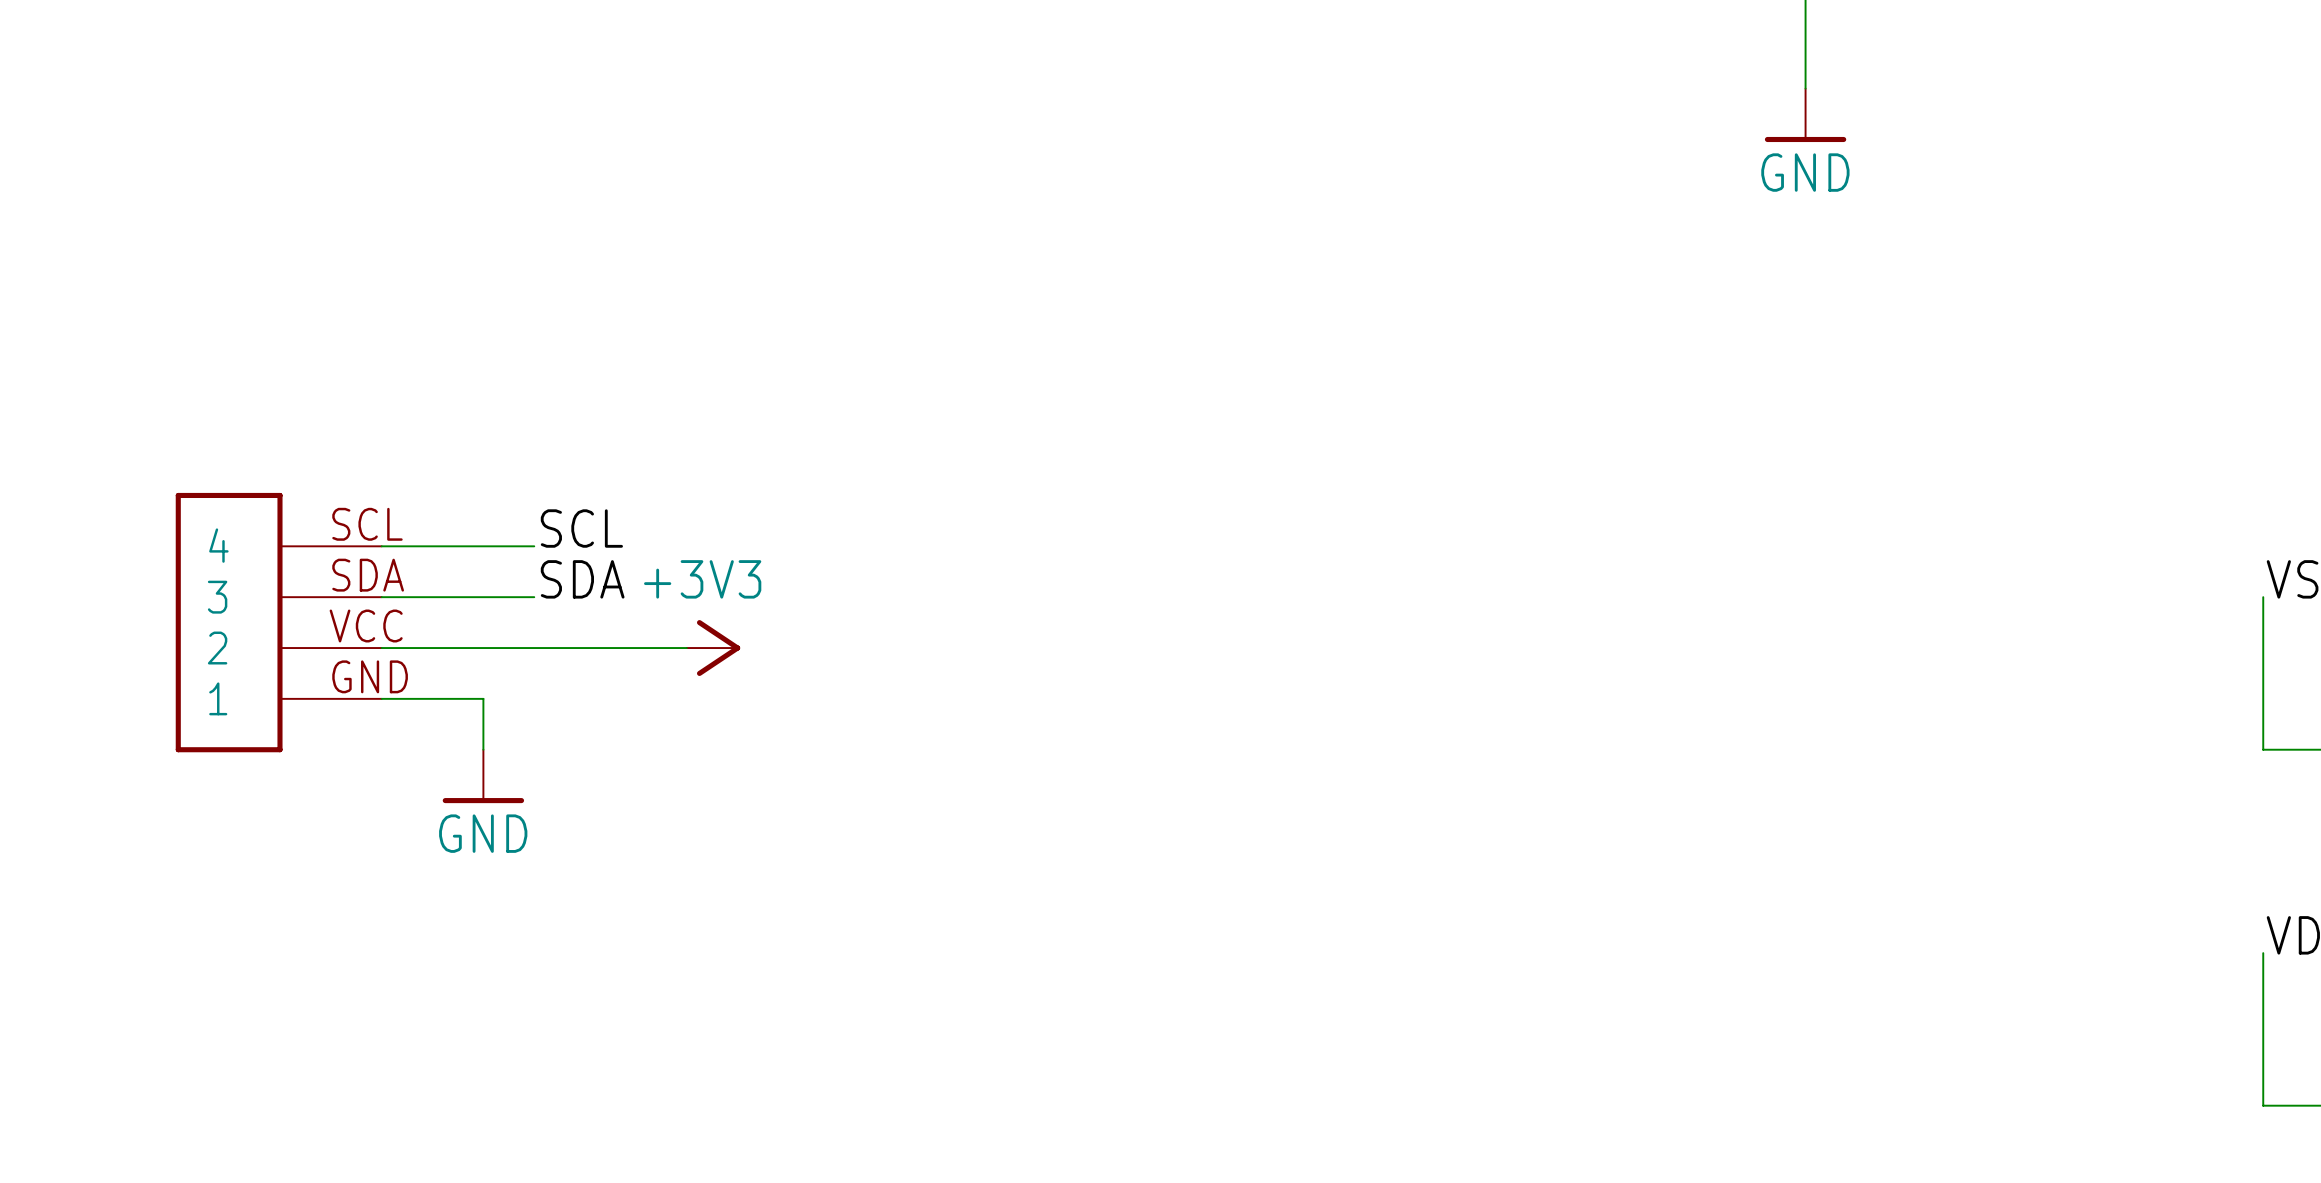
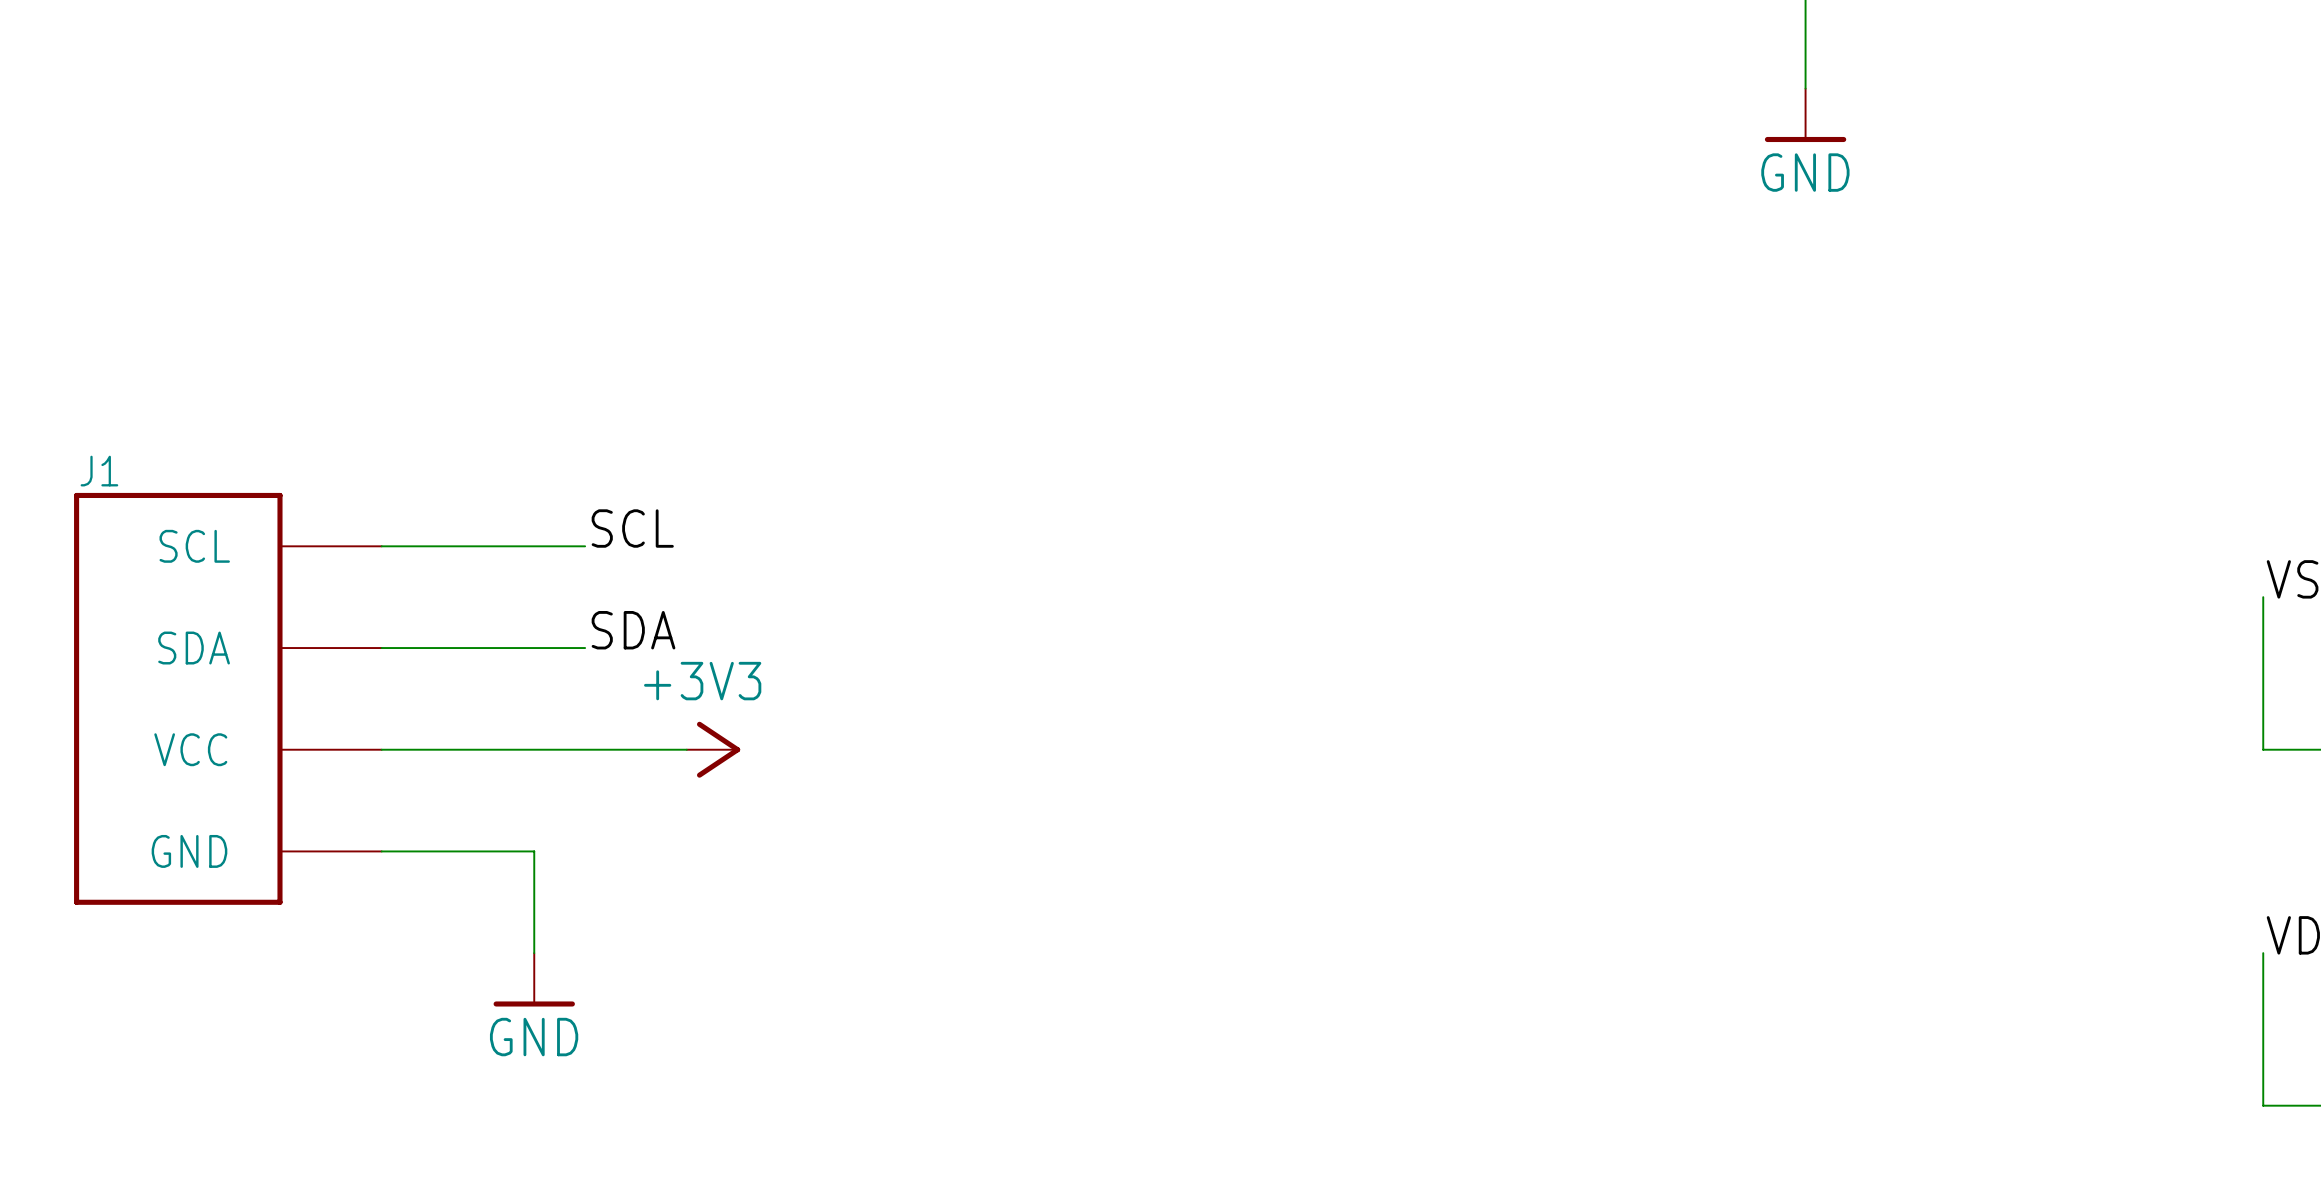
label position: SCL (581, 528) -> SCL (632, 528)
wire: none -> (534, 546) (585, 546)
label position: SDA (582, 579) -> SDA (633, 630)
wire: (381, 597) (534, 597) -> none
part: (278, 622) -> none
wire: (585, 648) (686, 648) -> none
power symbol position: +3V3 (713, 648) -> +3V3 (713, 749)
J1: none -> (227, 698)
wire: (381, 698) (483, 698) (483, 749) -> none
wire: none -> (381, 749) (686, 749)
power symbol position: GND (483, 776) -> GND (534, 979)
wire: none -> (381, 851) (534, 851) (534, 953)

